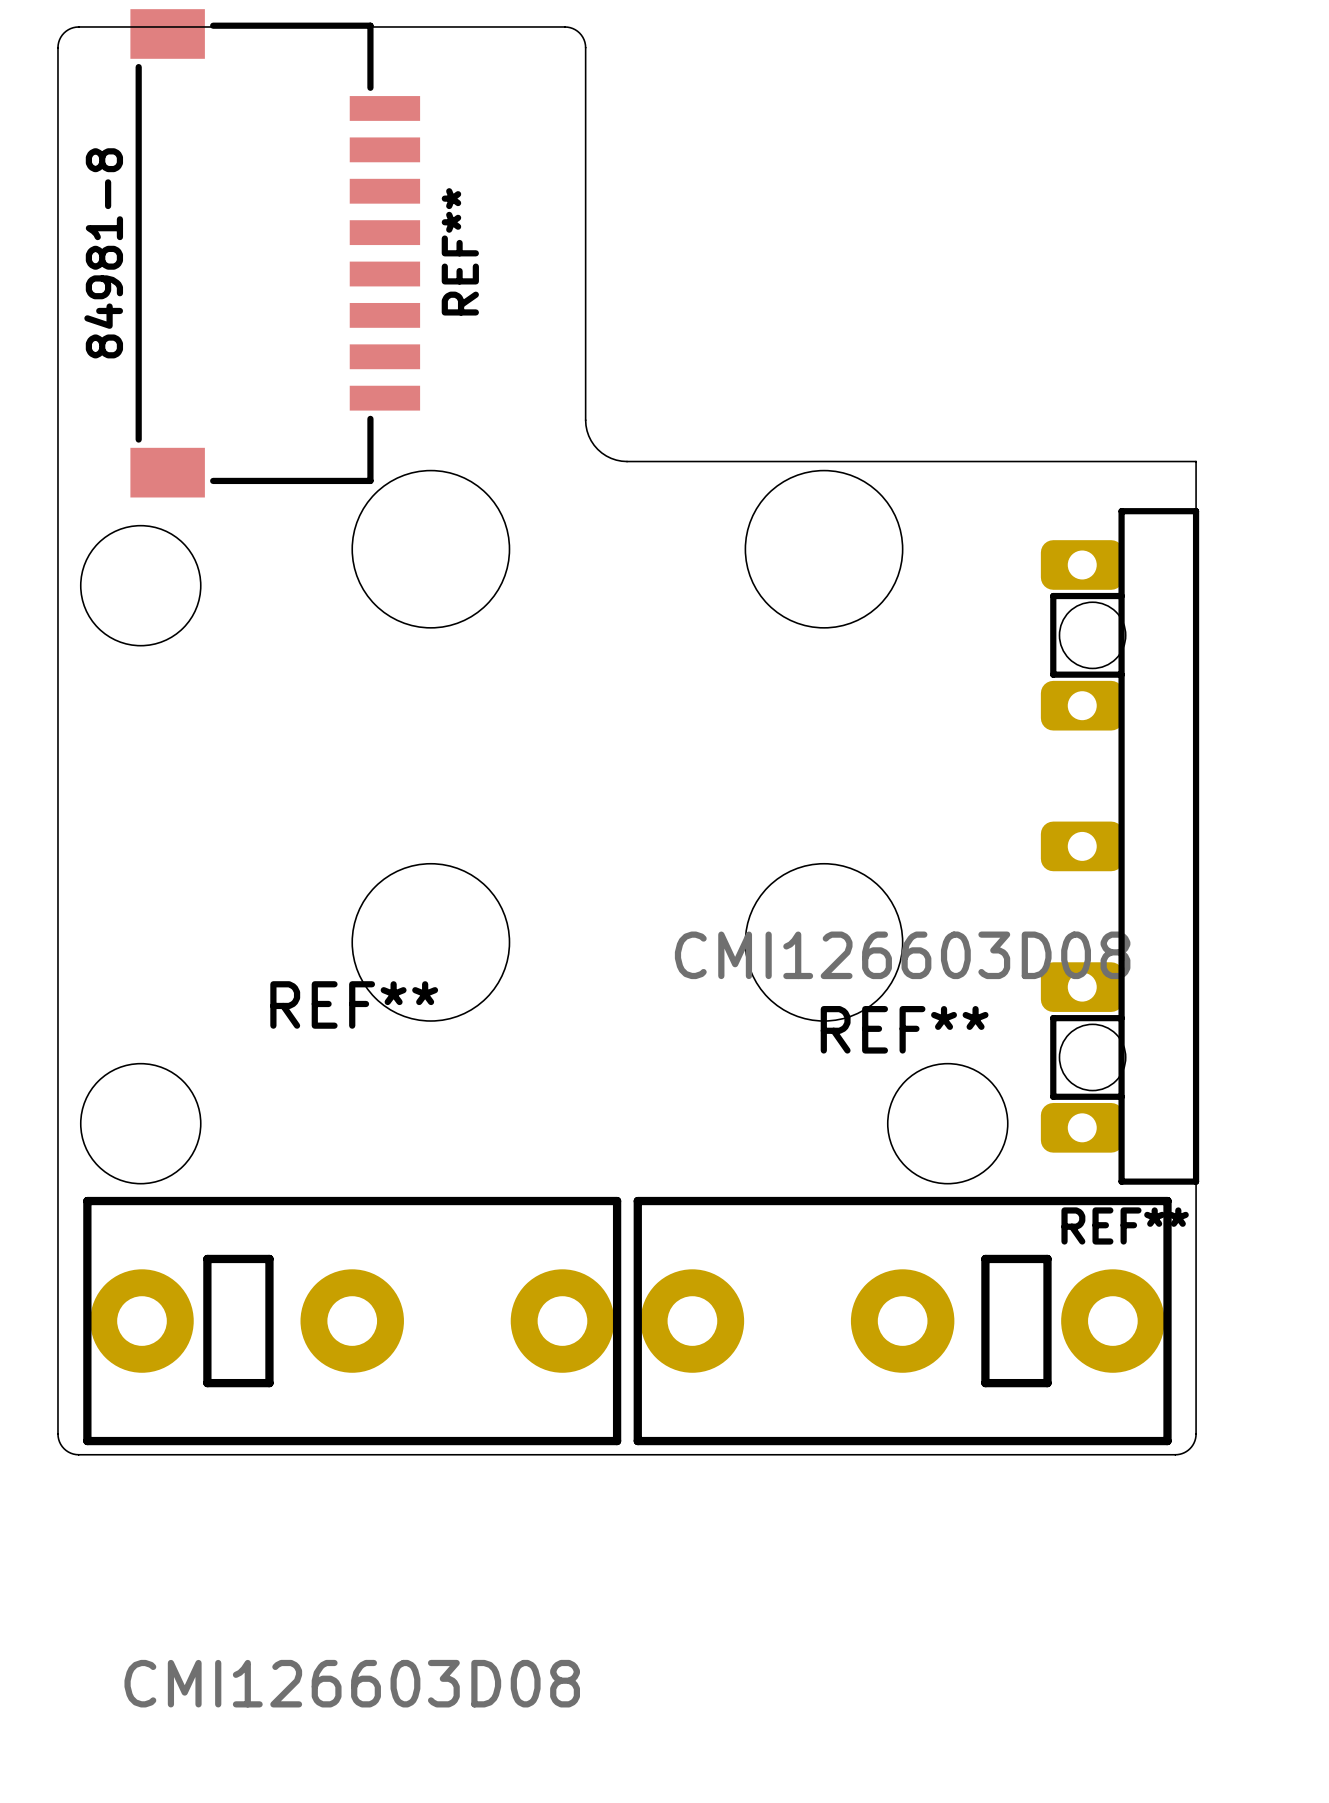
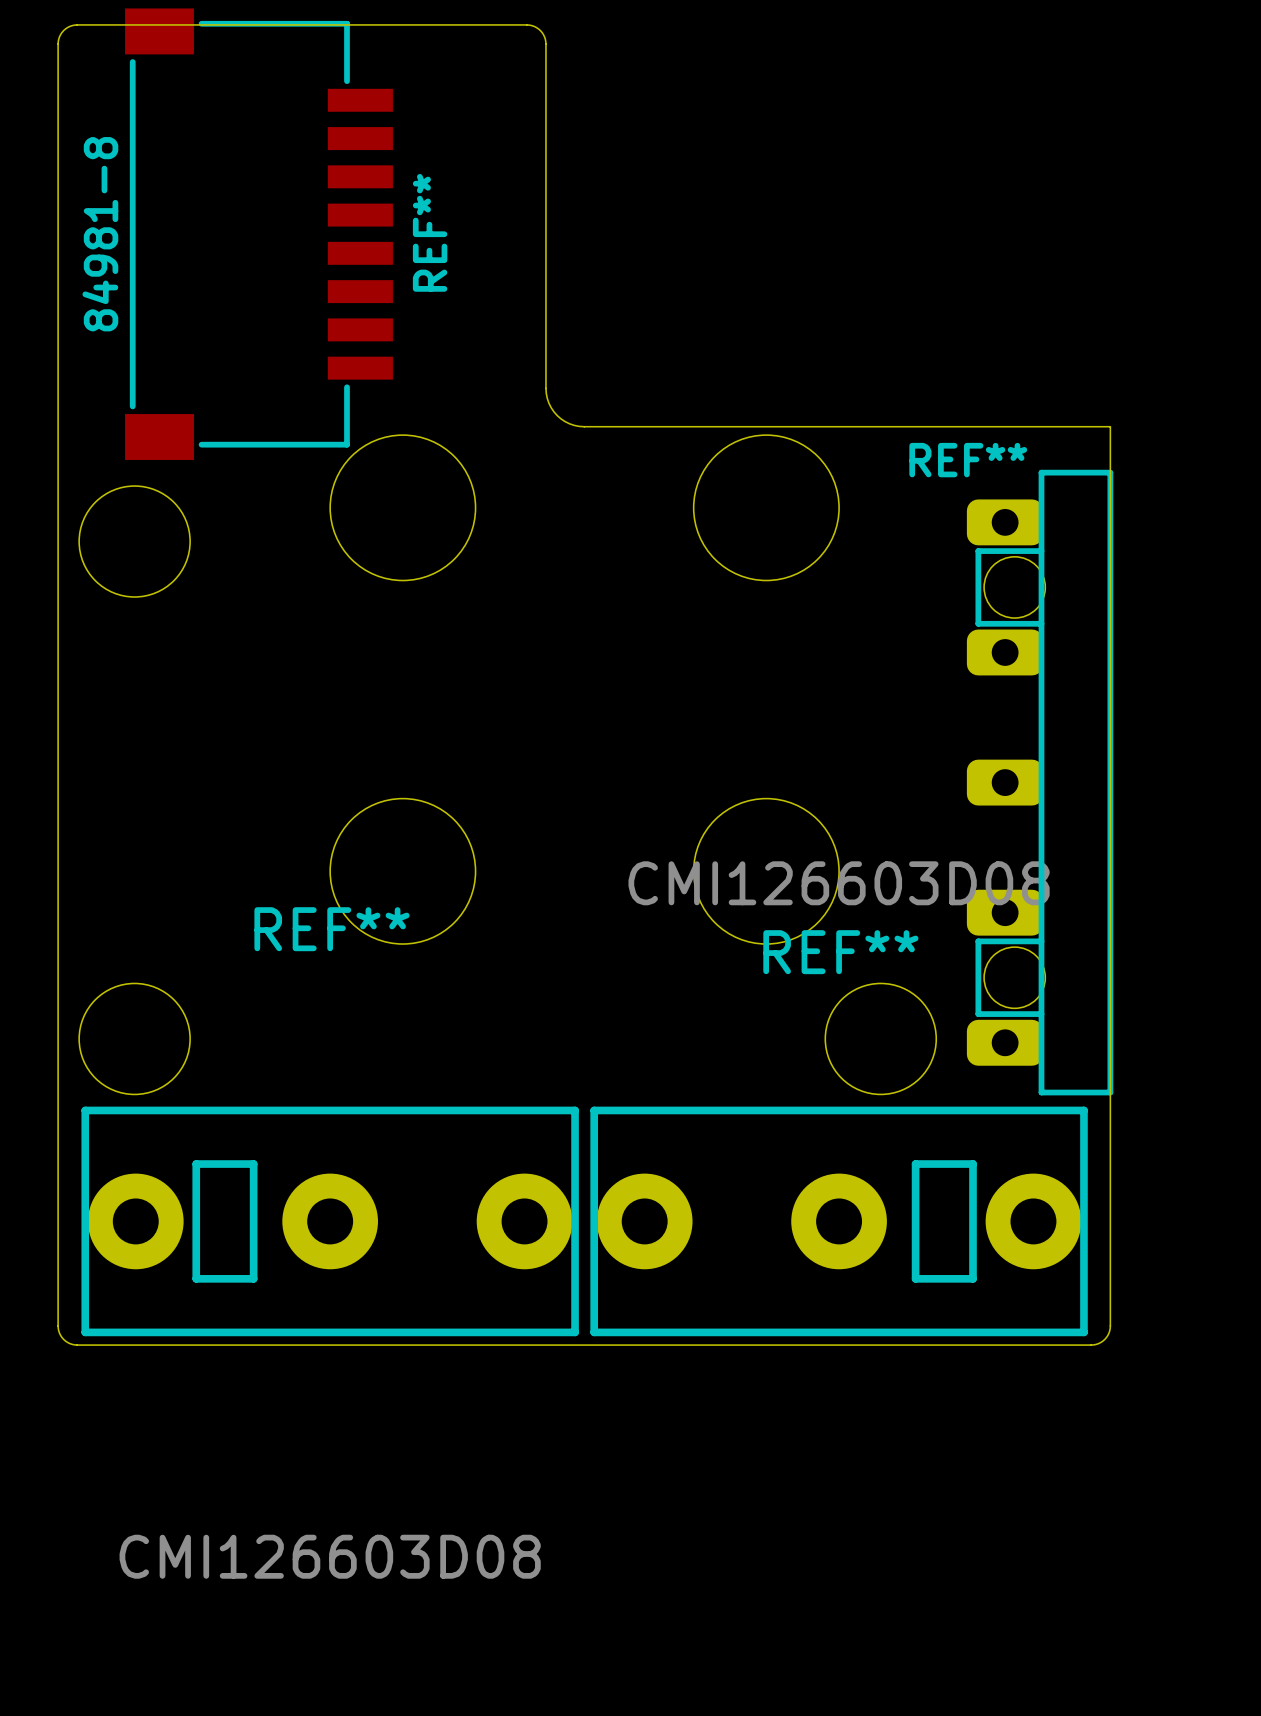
REF** name position: REF** (1125, 1225) -> REF** (968, 460)

